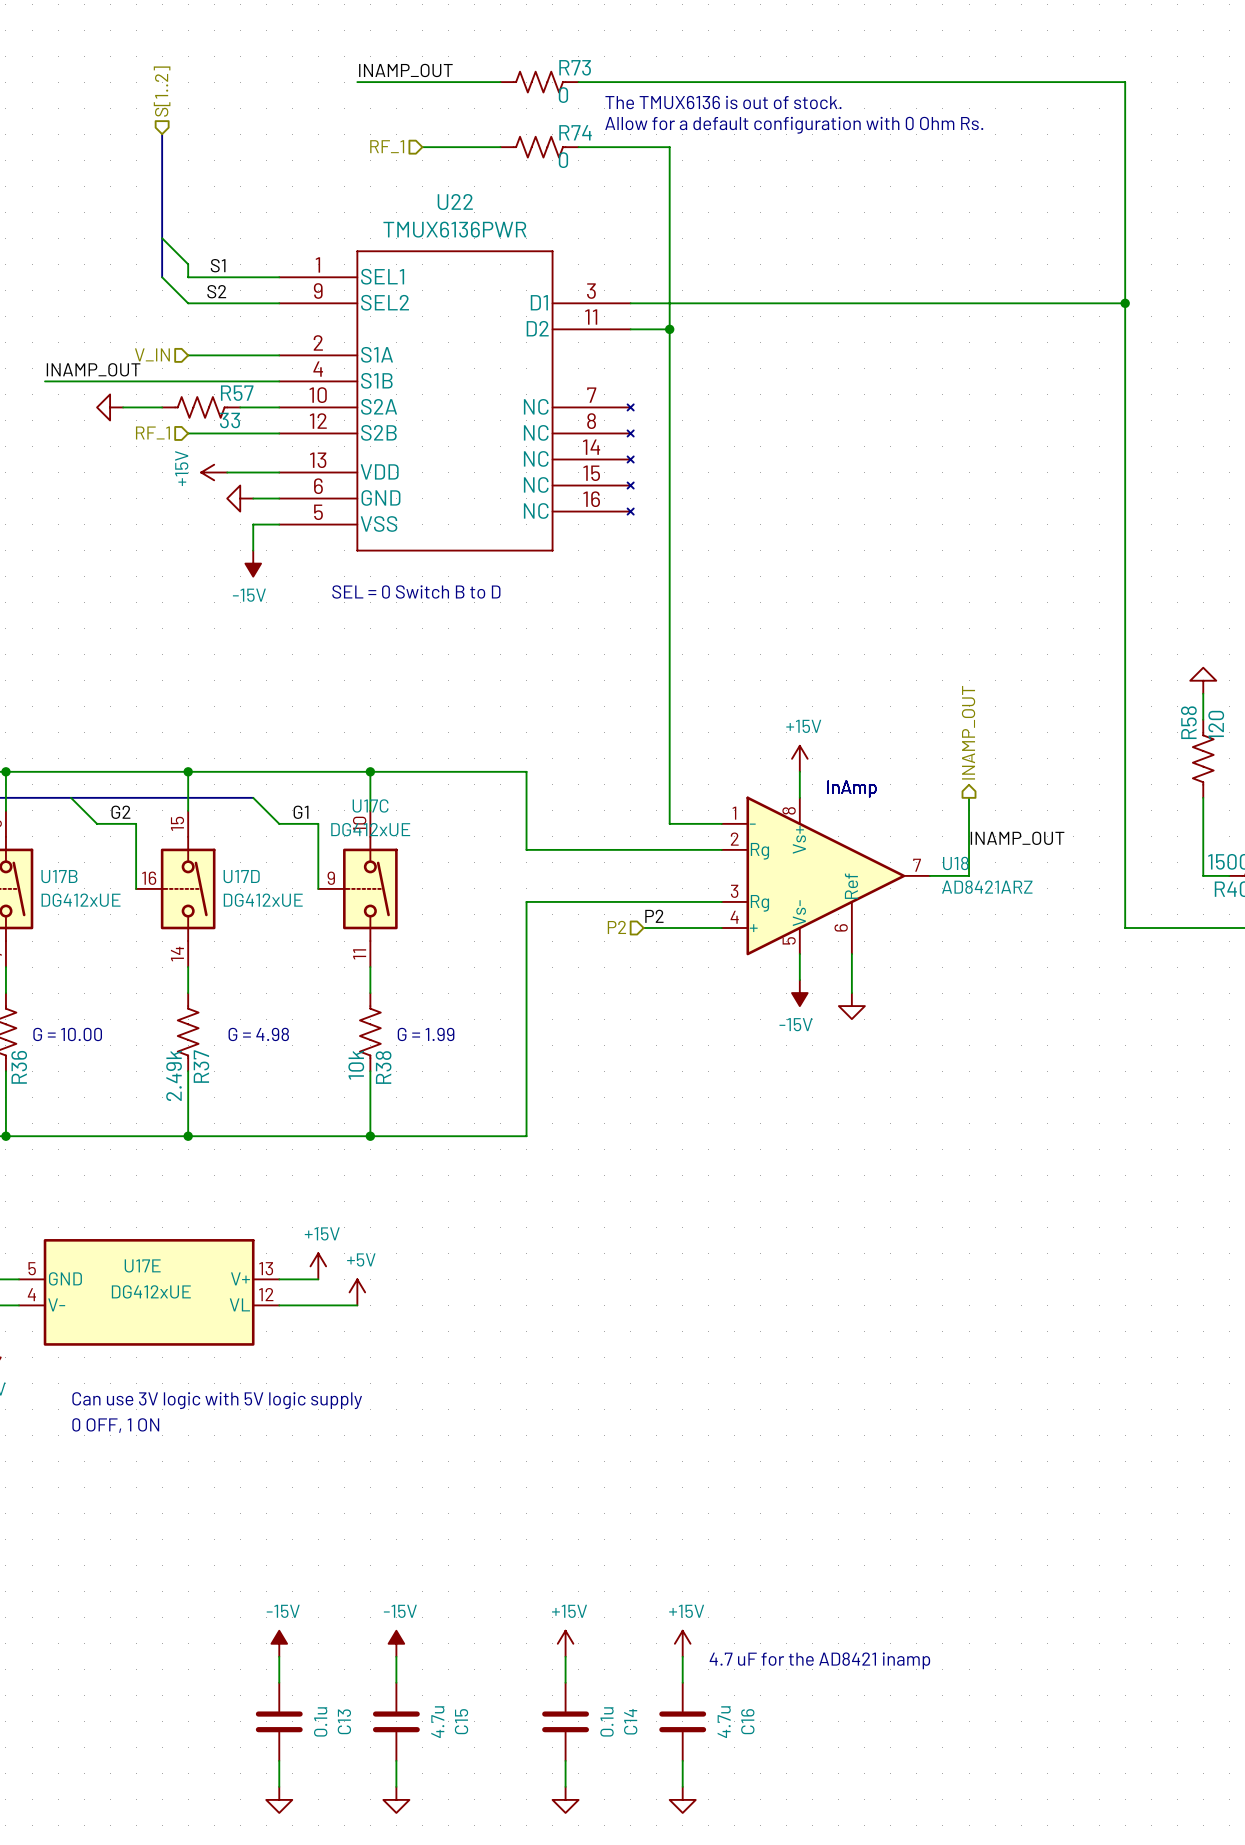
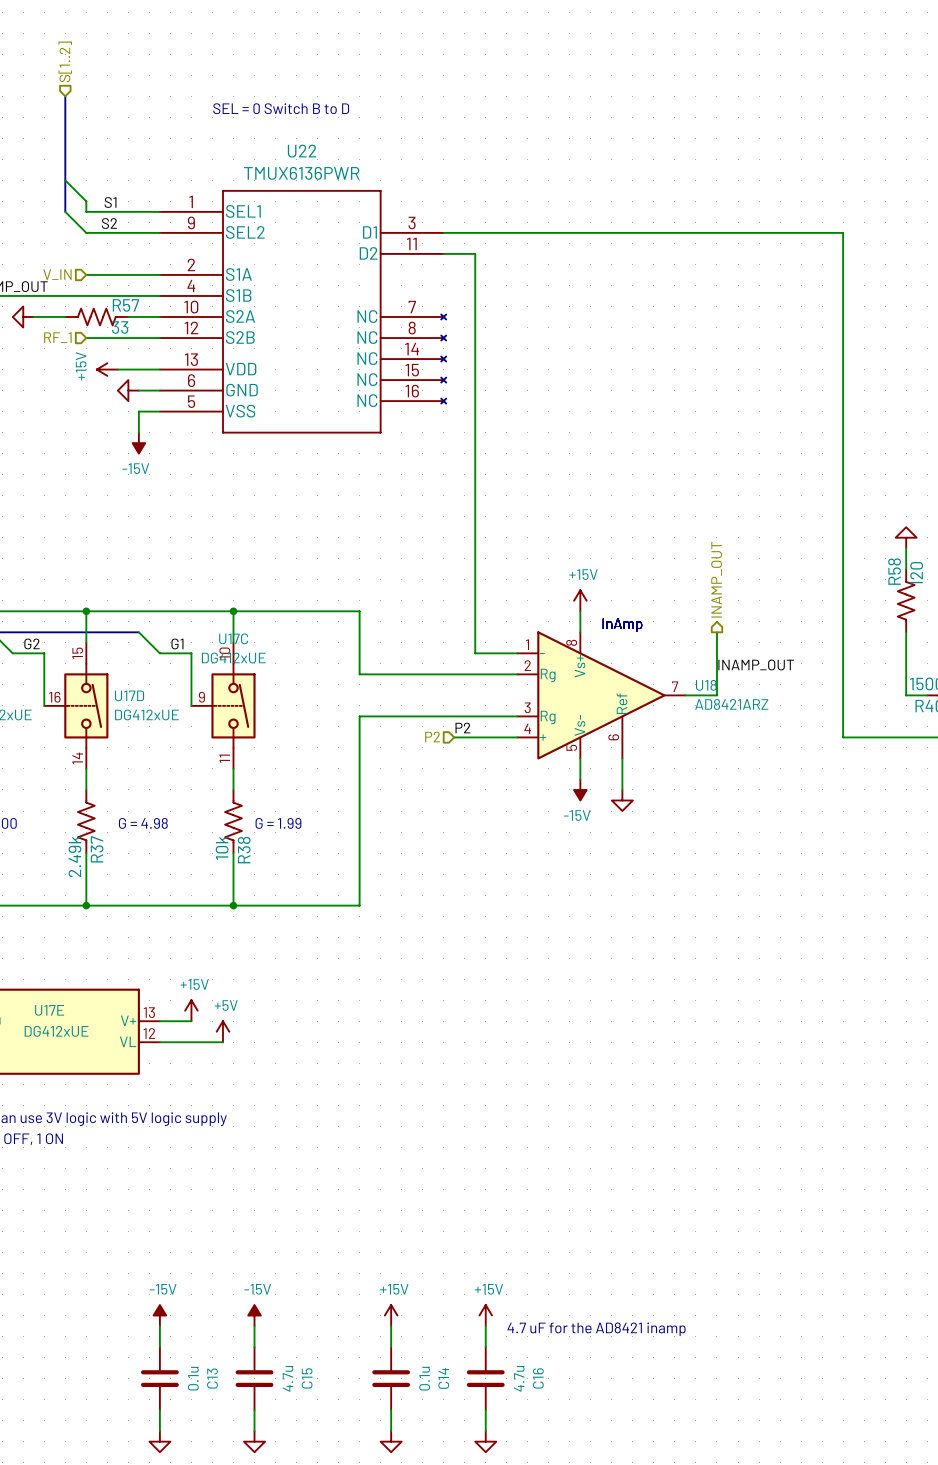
label: INAMP_OUT (405, 70) -> none
wire: (357, 82) (500, 82) -> none
R73: 0 (539, 82) -> none
wire: (578, 82) (1125, 82) (1125, 303) -> none
text: The TMUX6136 is out of stock. (723, 102) -> none
text: Allow for a default configuration with 0 Ohm Rs. (794, 125) -> none
hierarchical label: RF_1 (387, 146) -> none
wire: (422, 147) (500, 147) -> none
R74: 0 (539, 147) -> none
wire: (578, 147) (669, 147) (669, 329) -> none
text: none -> SEL = 0 Switch B to D (281, 108)
junction: (1125, 303) -> none
junction: (669, 329) -> none
text: SEL = 0 Switch B to D (416, 591) -> none

